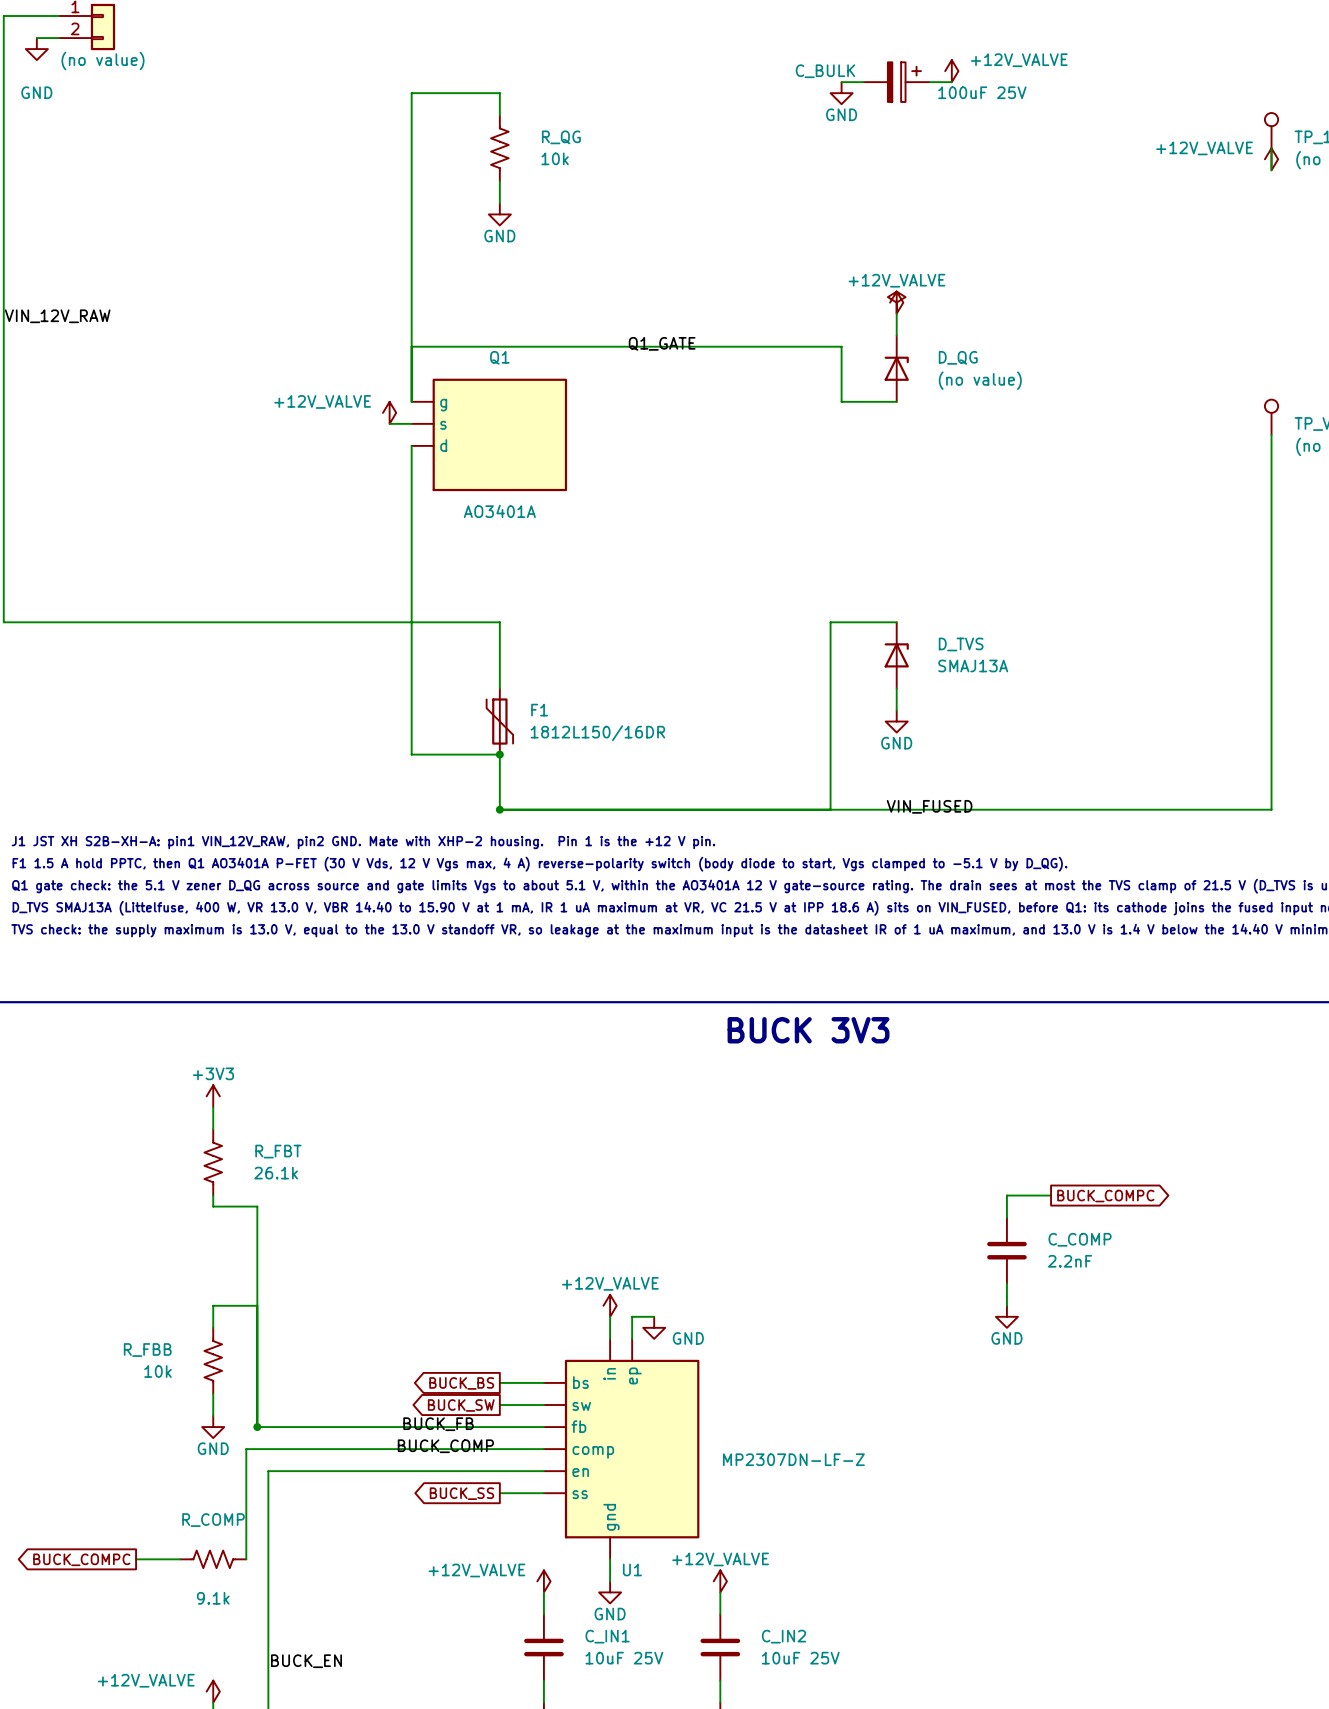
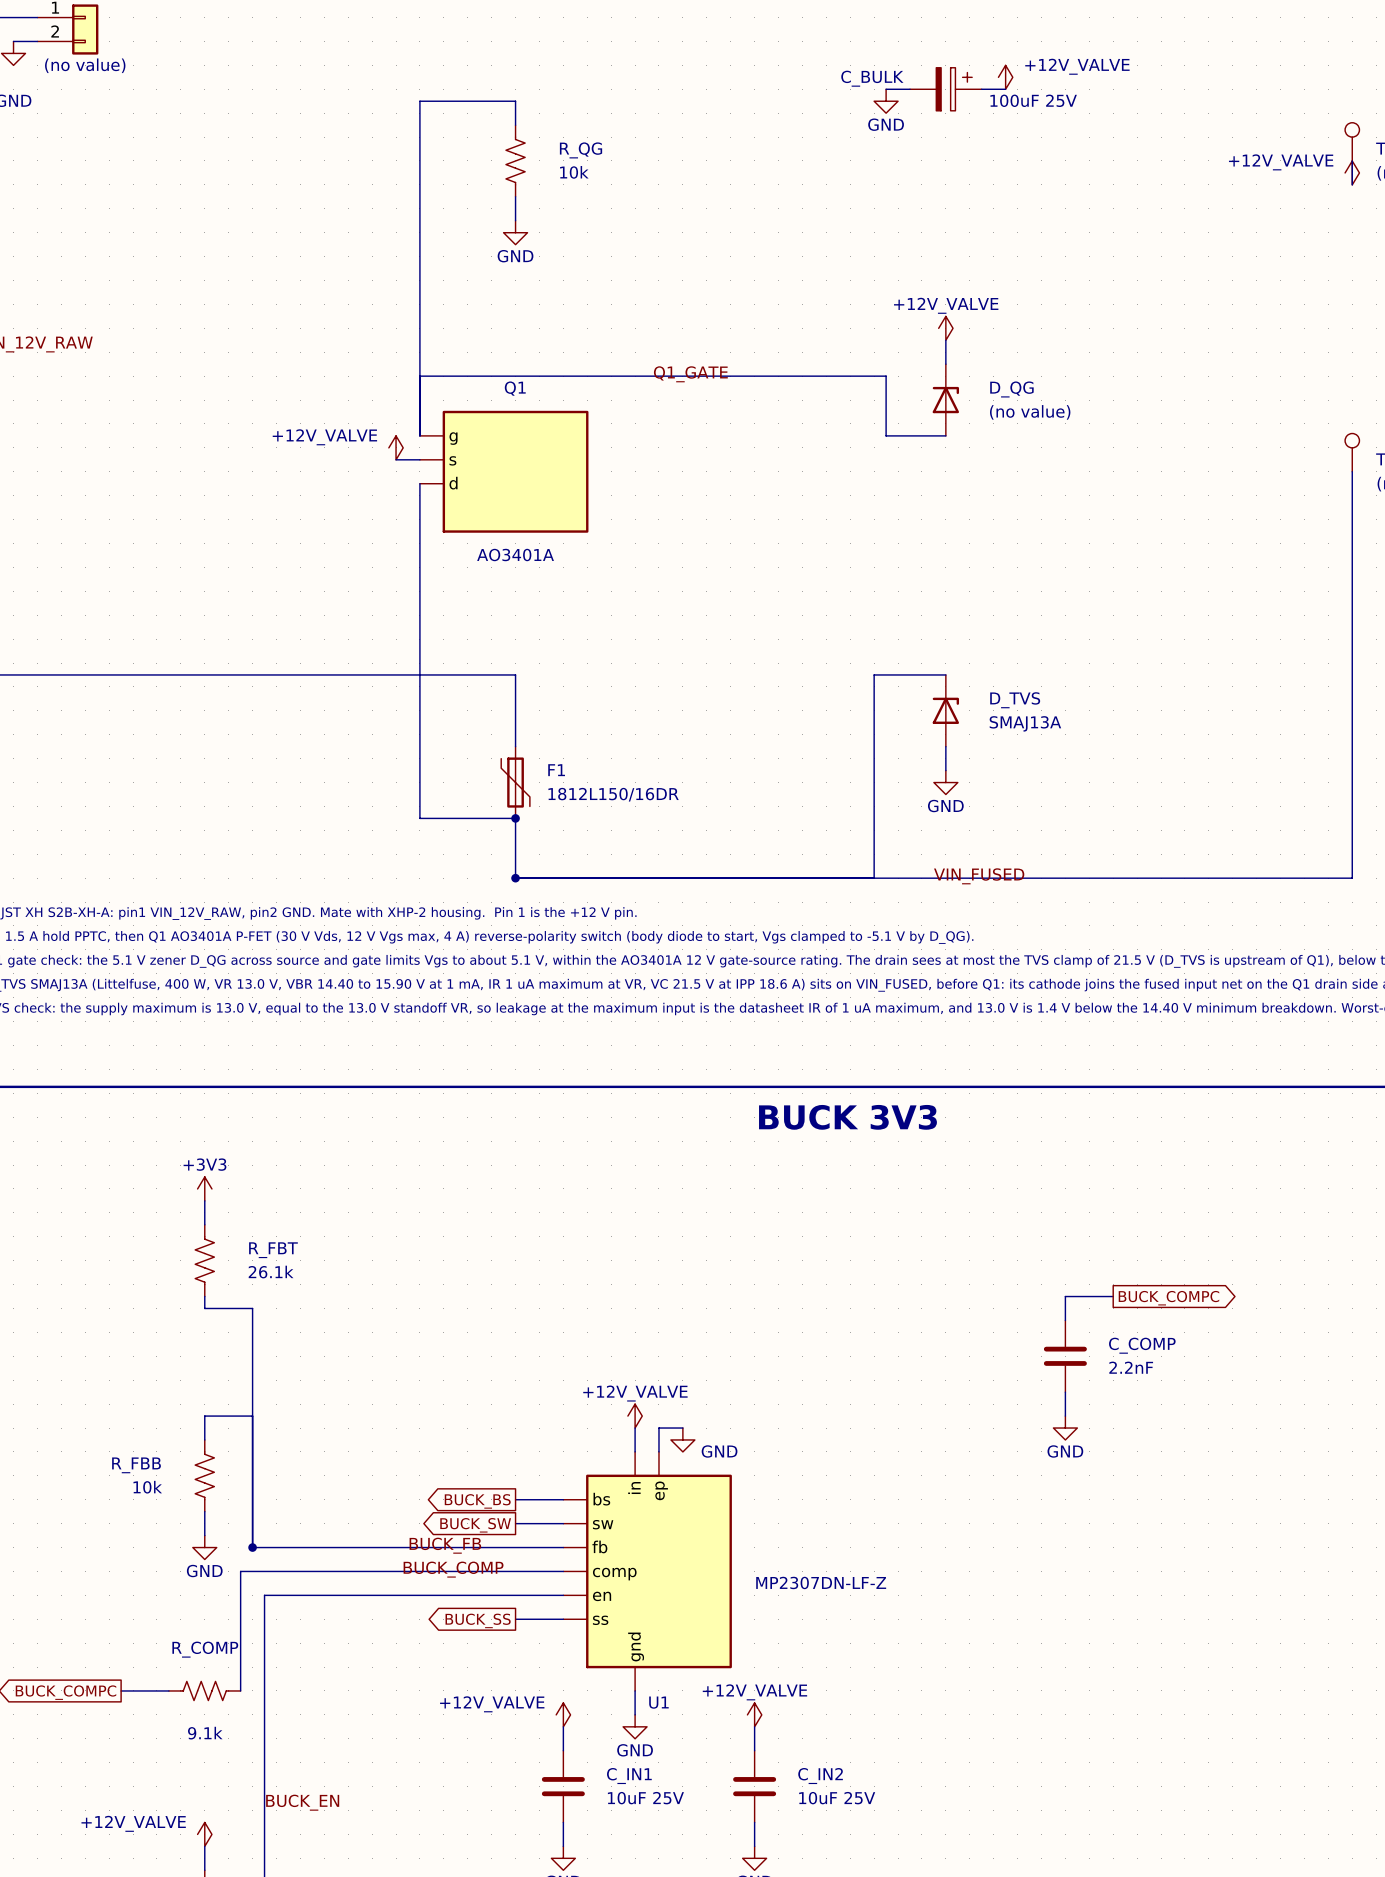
power symbol: (896, 302) -> none

